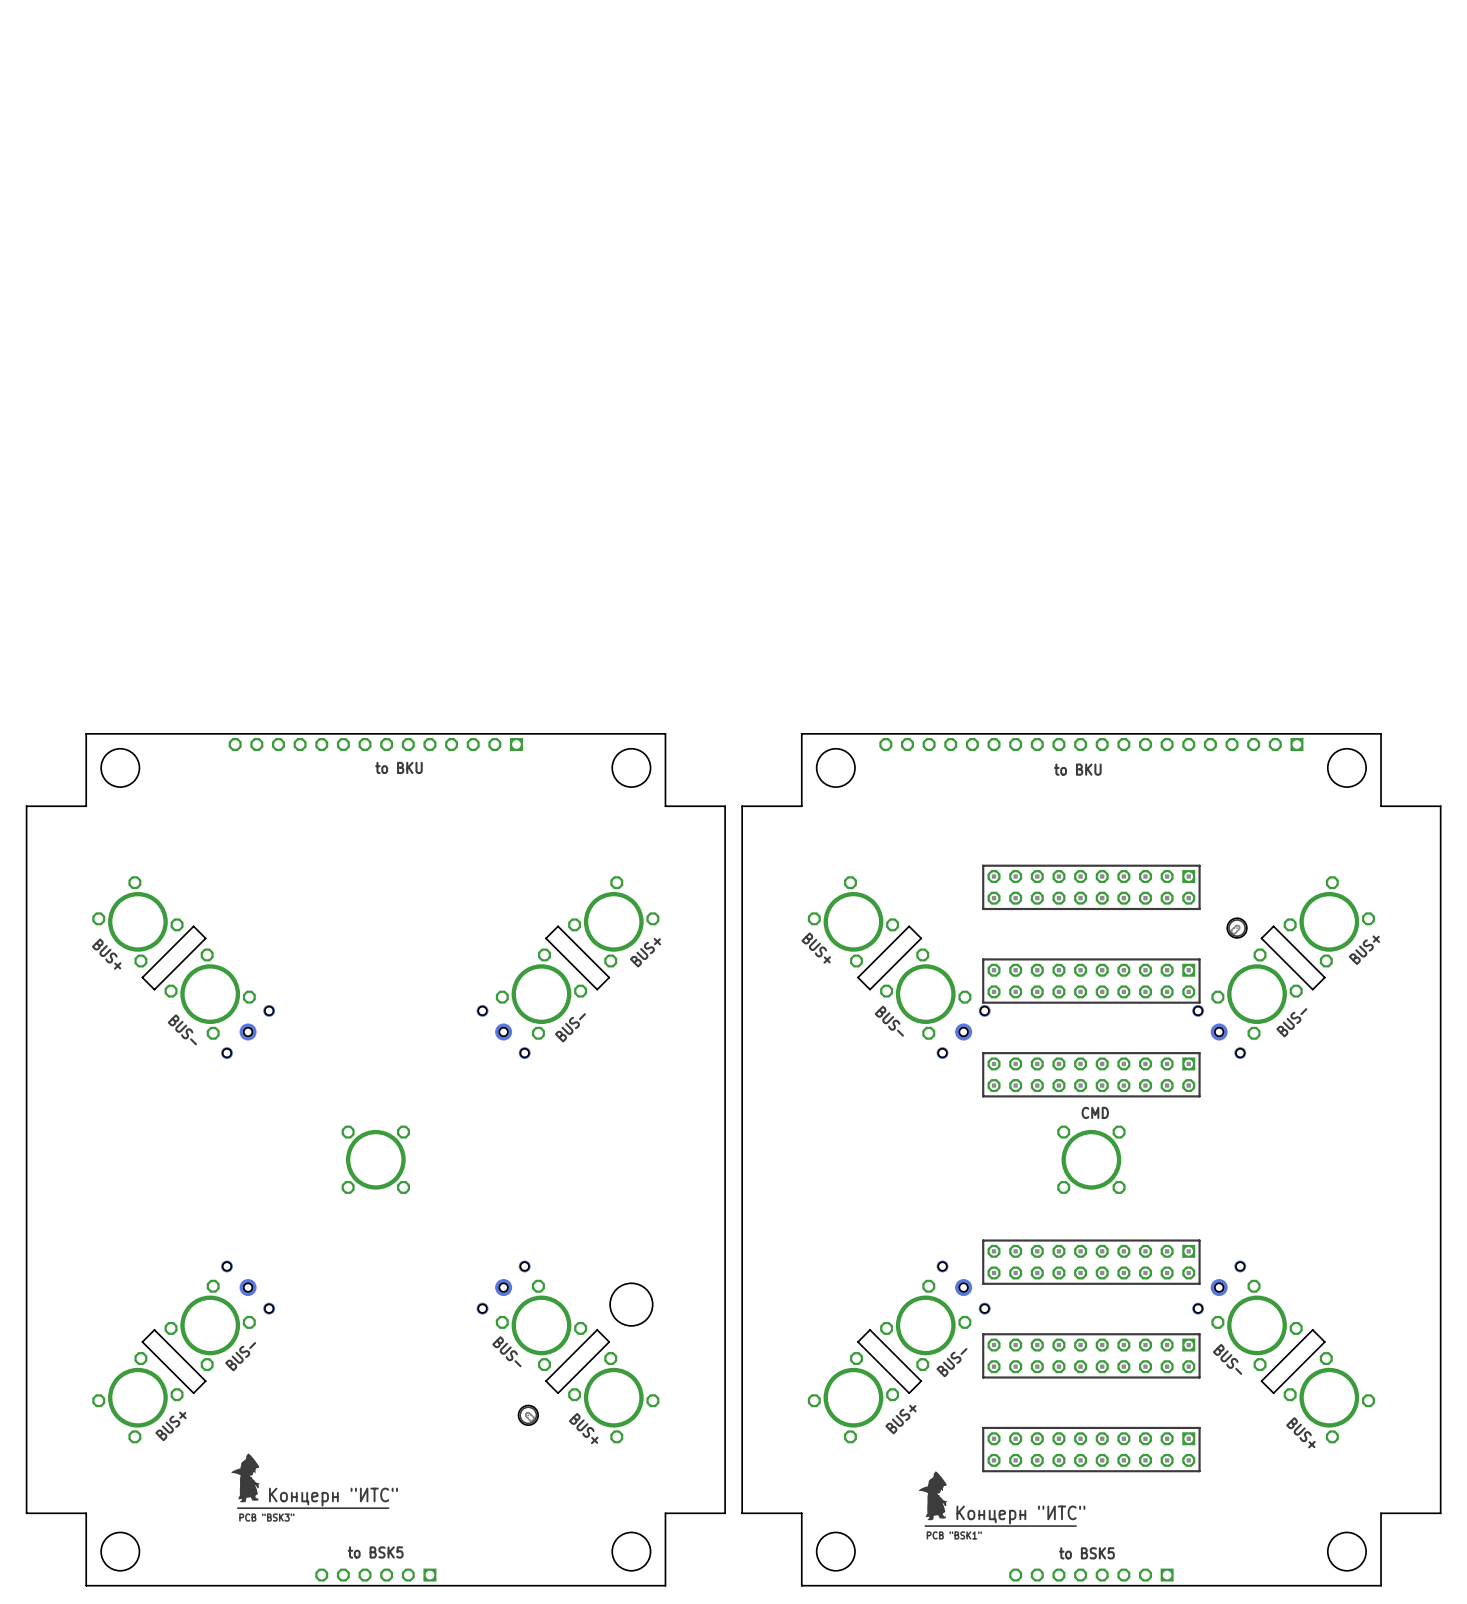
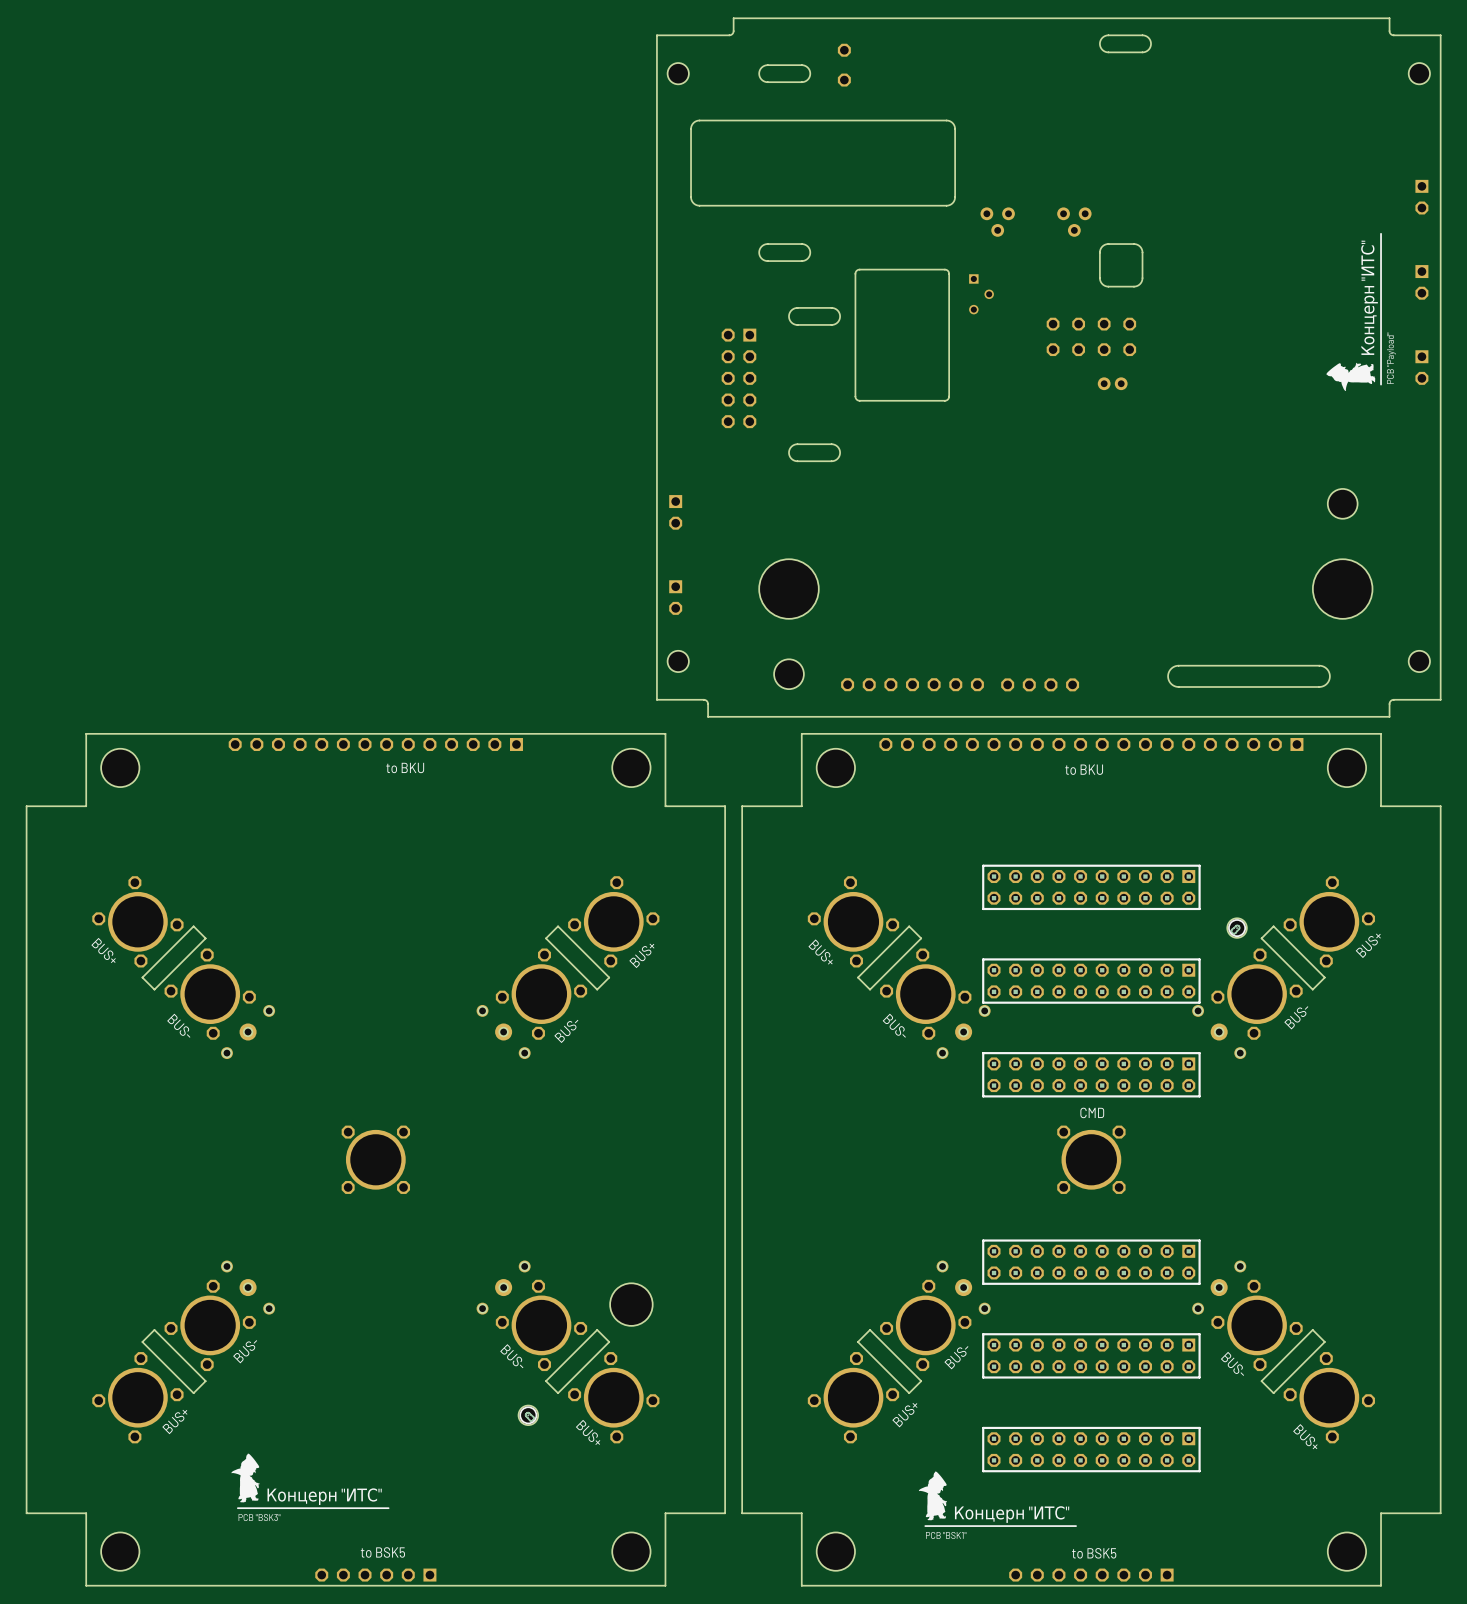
board edge: none -> (1389, 18) (733, 18) (733, 31) (730, 35) (656, 35) (656, 699) (704, 699) (708, 703) (708, 716) (1389, 716) (1389, 703) (1392, 699) (1440, 699) (1440, 35) (1392, 35) (1389, 31) (1389, 18)
board edge: none -> (1142, 35) (1106, 35) (1101, 39) (1100, 46) (1107, 52) (1144, 52) (1149, 49) (1150, 42) (1147, 37) (1142, 35)
board edge: none -> (801, 65) (765, 65) (760, 69) (759, 75) (766, 82) (803, 81) (808, 78) (810, 72) (806, 66) (801, 65)
part: none -> (844, 65)
hole: none -> (678, 73)
hole: none -> (1419, 73)
board edge: none -> (946, 120) (697, 120) (691, 127) (691, 199) (694, 203) (699, 205) (948, 205) (955, 198) (955, 129) (952, 123) (946, 120)
part: none -> (1421, 197)
part: none -> (997, 222)
part: none -> (1074, 222)
drawing: none -> [1326, 233, 1382, 391]
board edge: none -> (801, 244) (765, 244) (760, 248) (759, 254) (766, 261) (803, 260) (808, 257) (810, 251) (806, 245) (801, 244)
board edge: none -> (1133, 244) (1107, 244) (1101, 247) (1099, 278) (1103, 284) (1133, 286) (1140, 283) (1142, 251) (1139, 245) (1133, 244)
part: none -> (1421, 282)
part: none -> (981, 294)
board edge: none -> (831, 307) (795, 308) (790, 312) (789, 318) (796, 324) (833, 324) (838, 321) (840, 315) (836, 309) (831, 307)
part: none -> (902, 335)
part: none -> (1053, 336)
part: none -> (1078, 336)
part: none -> (1104, 336)
part: none -> (1129, 336)
part: none -> (1421, 367)
part: none -> (738, 378)
part: none -> (1112, 383)
board edge: none -> (831, 444) (795, 444) (790, 448) (789, 454) (796, 461) (833, 460) (838, 457) (840, 451) (836, 445) (831, 444)
hole: none -> (1342, 503)
part: none -> (675, 512)
hole: none -> (788, 589)
hole: none -> (1342, 589)
part: none -> (675, 597)
hole: none -> (678, 661)
hole: none -> (1419, 661)
board edge: none -> (1319, 665) (1177, 665) (1170, 669) (1168, 677) (1172, 684) (1178, 686) (1320, 686) (1327, 682) (1329, 676) (1326, 668) (1319, 665)
hole: none -> (788, 674)
part: none -> (912, 684)
part: none -> (1040, 684)

